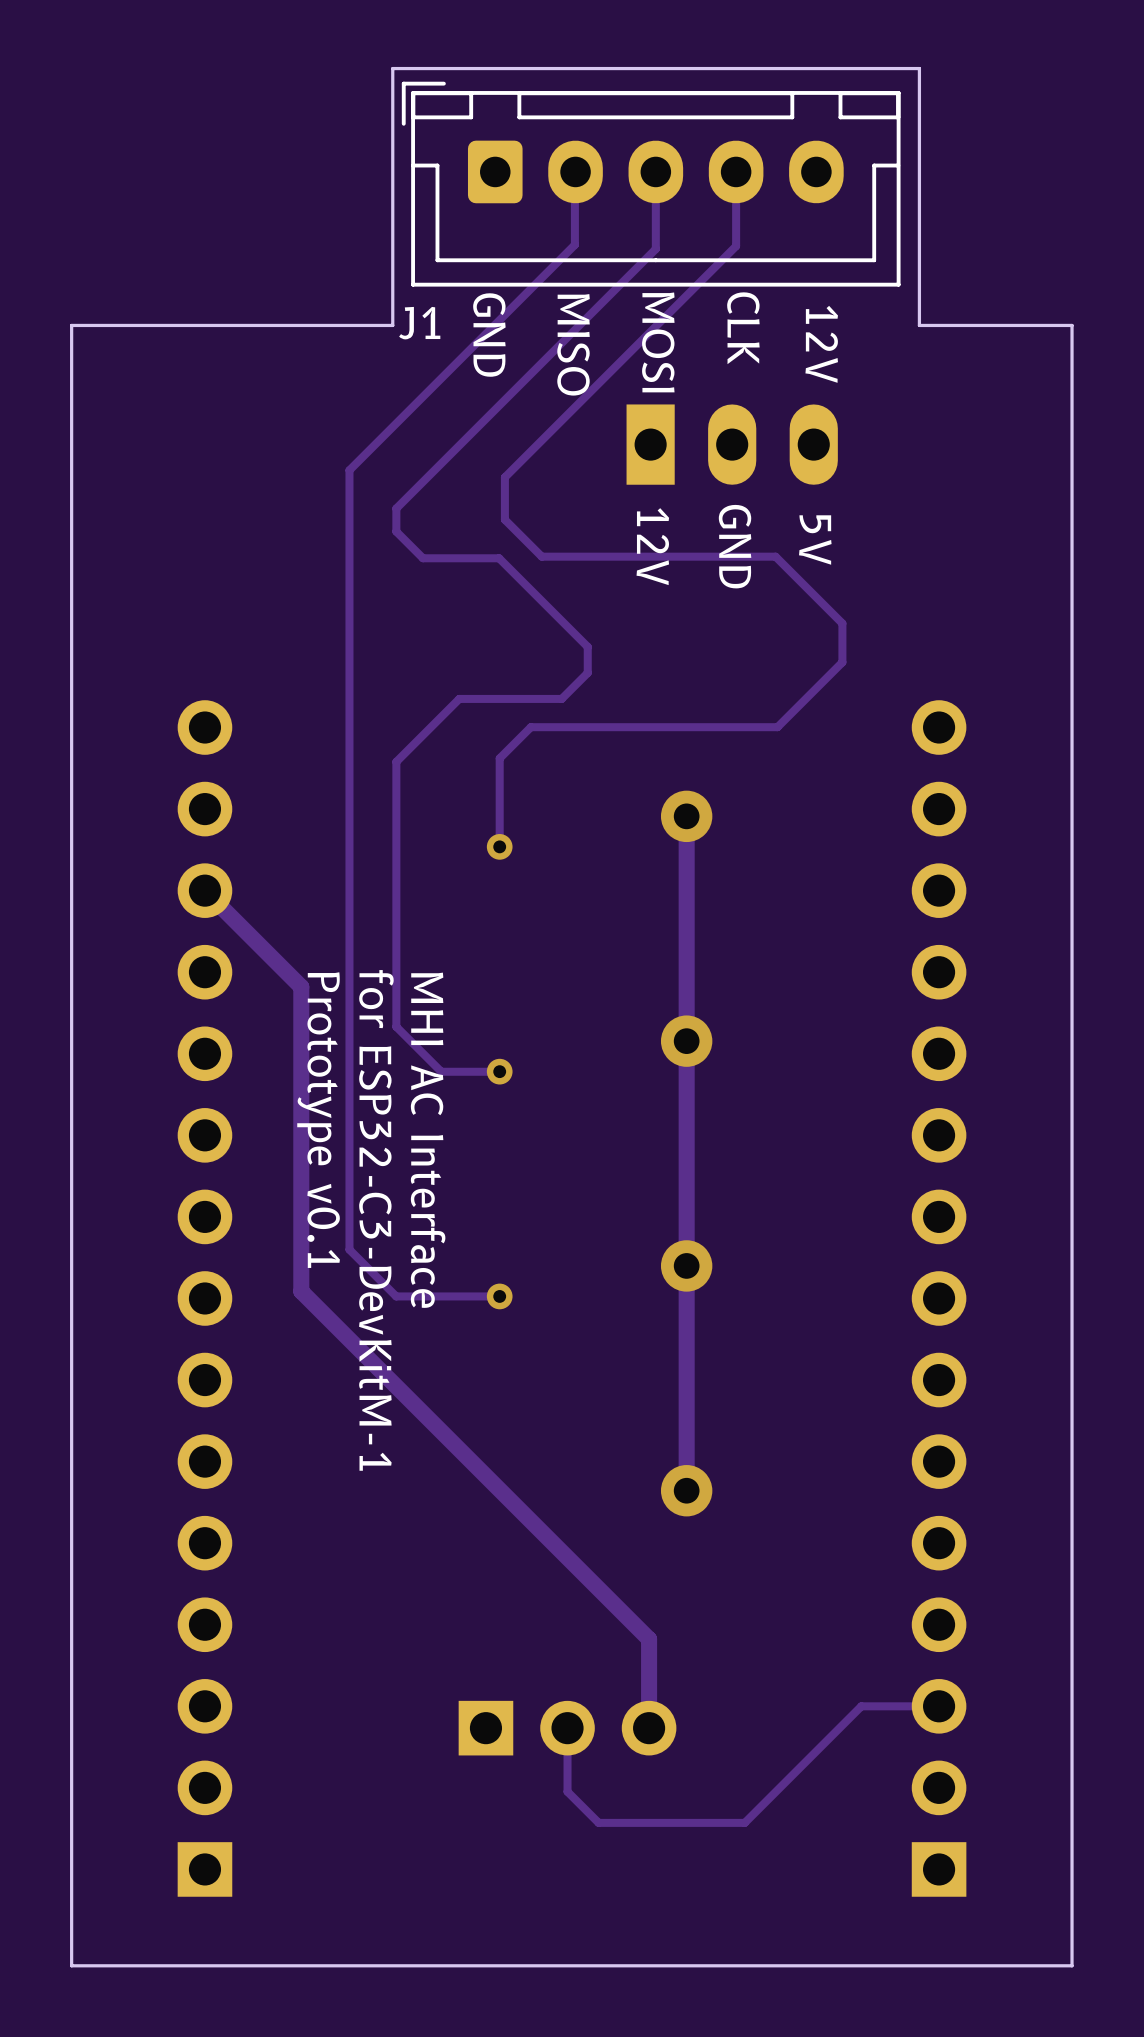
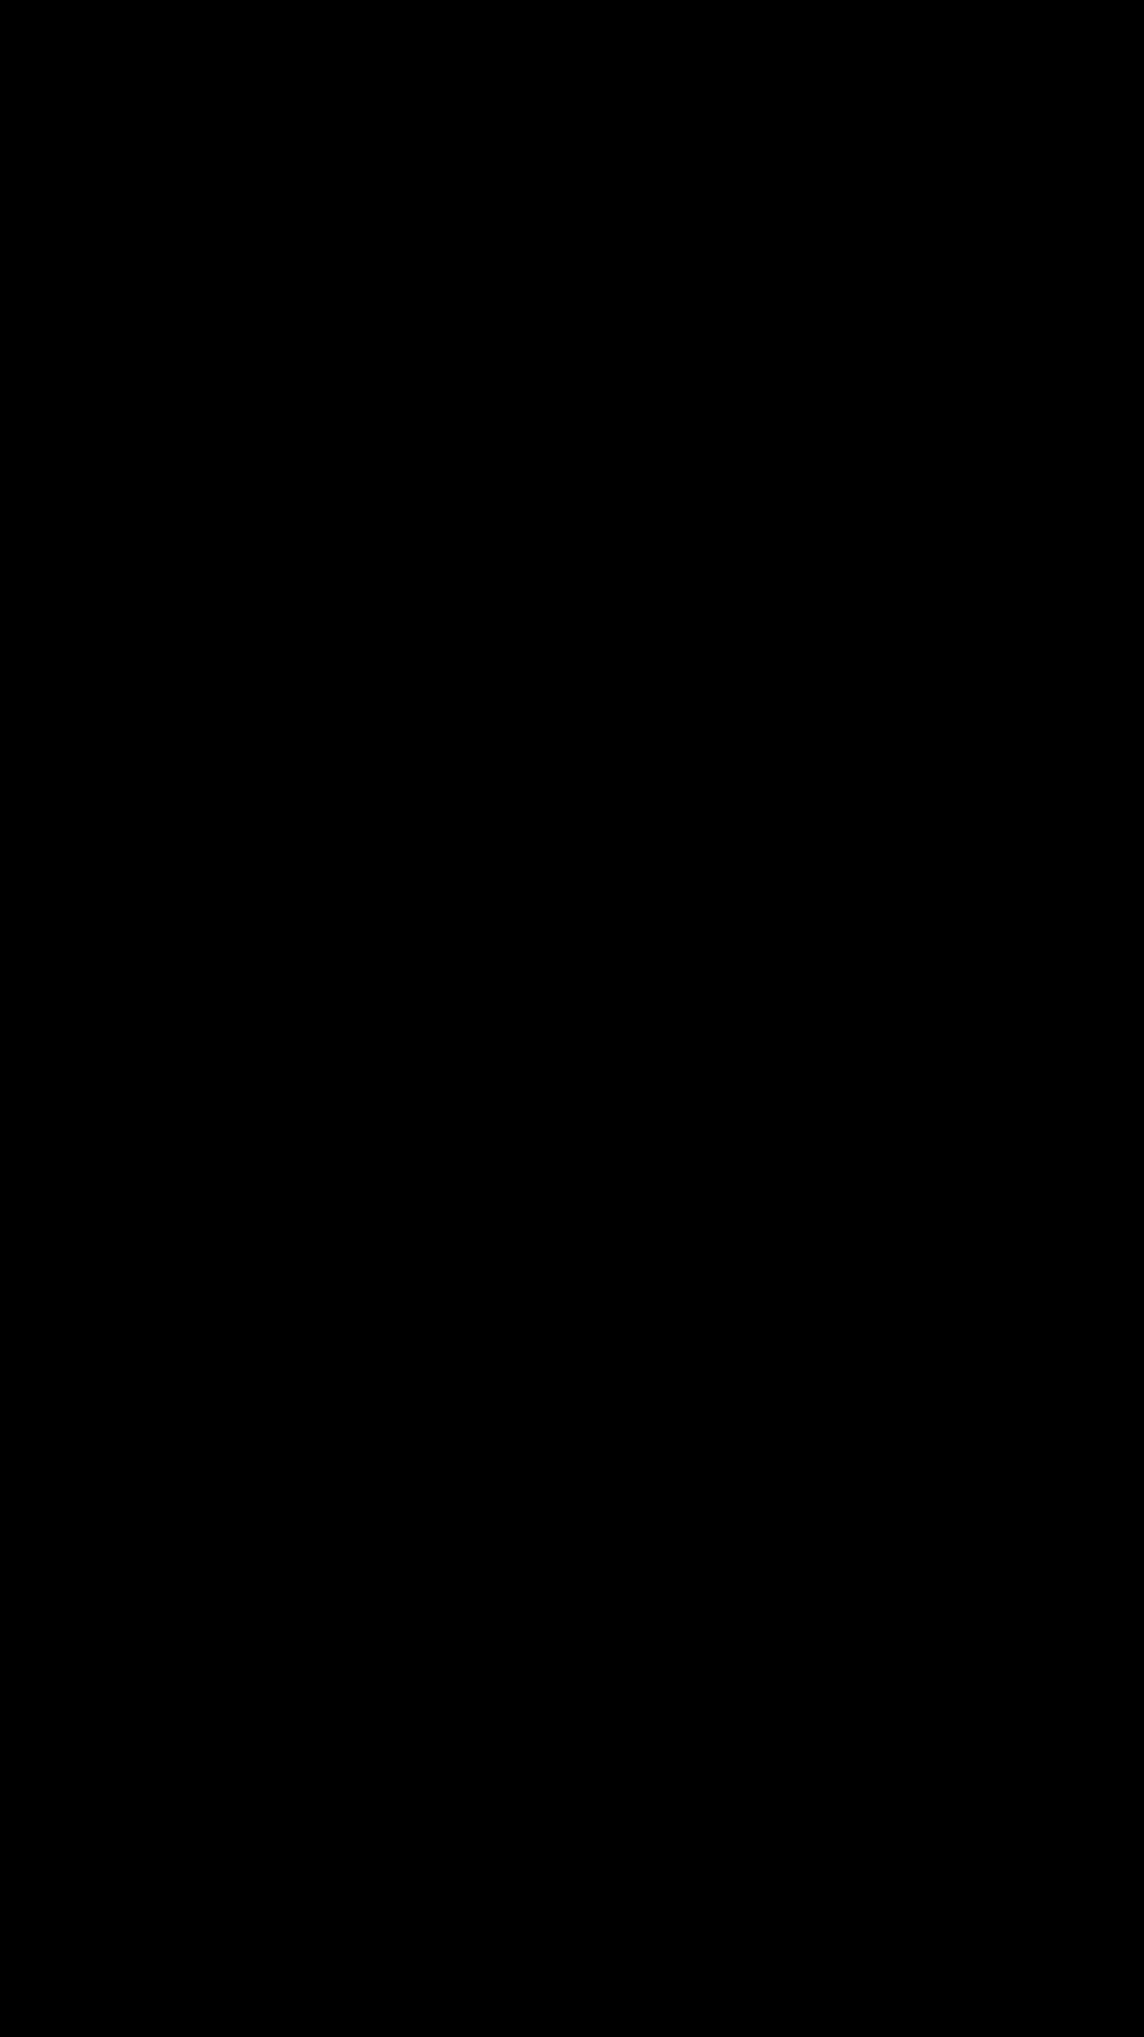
board edge: (919, 68) (392, 68) (392, 325) (71, 325) (71, 1965) (1072, 1965) (1072, 325) (919, 325) (919, 68) -> none
track: (655, 171) (655, 249) (396, 508) (396, 531) (423, 558) (499, 558) (587, 646) (587, 672) (561, 698) (459, 698) (396, 761) (396, 1026) (441, 1071) (499, 1071) -> none
track: (736, 171) (736, 246) (504, 477) (504, 519) (541, 556) (775, 556) (842, 623) (842, 662) (777, 727) (530, 727) (499, 758) (499, 846) -> none
track: (574, 172) (574, 244) (349, 470) (349, 1249) (396, 1296) (499, 1296) -> none
J1: (651, 184) -> none
text: CLK (743, 328) -> none
text: GND (489, 335) -> none
text: MOSI (658, 342) -> none
text: MISO (573, 344) -> none
text: 12V (821, 344) -> none
part: (732, 444) -> none
text: 5V (815, 540) -> none
text: 12V (652, 546) -> none
text: GND (735, 546) -> none
track: (686, 816) (686, 1490) -> none
via: (686, 816) -> none
via: (499, 846) -> none
track: (204, 890) (301, 986) (301, 1291) (649, 1639) (649, 1728) -> none
via: (686, 1041) -> none
via: (499, 1071) -> none
text: Prototype v0.1 (318, 1120) -> none
text: MHI AC Interface (428, 1140) -> none
text: for ESP32-C3-DevKitM-1 (376, 1220) -> none
via: (686, 1265) -> none
via: (499, 1296) -> none
part: (204, 1298) -> none
part: (939, 1298) -> none
via: (686, 1490) -> none
track: (939, 1706) (861, 1706) (744, 1822) (598, 1822) (567, 1791) (567, 1728) -> none
part: (567, 1728) -> none

